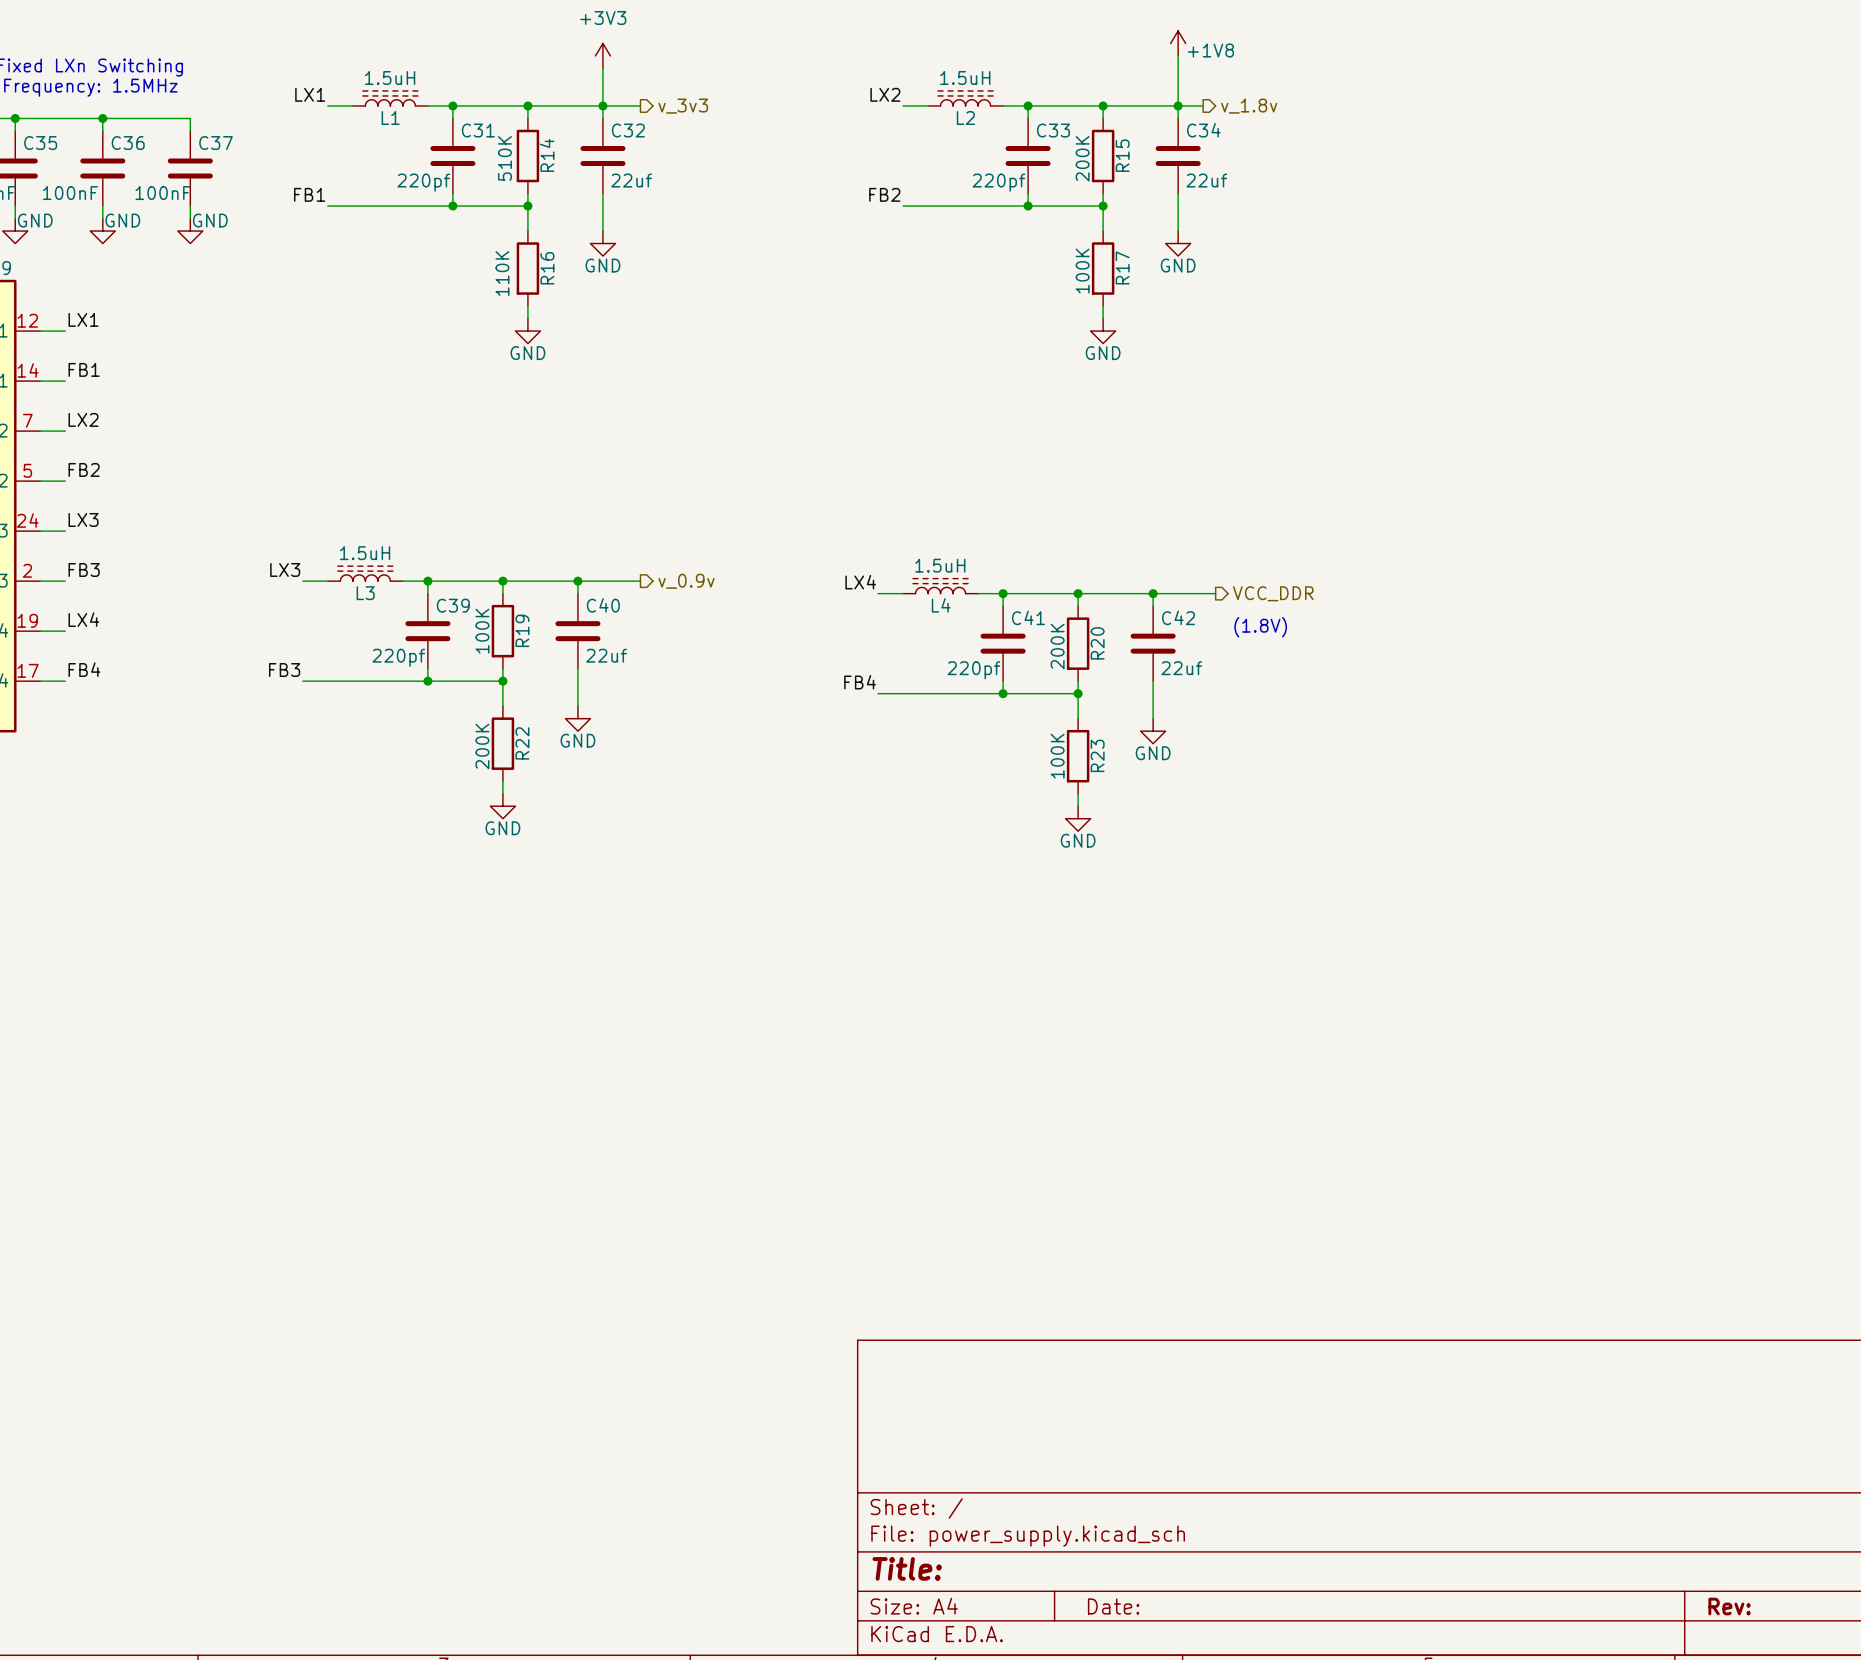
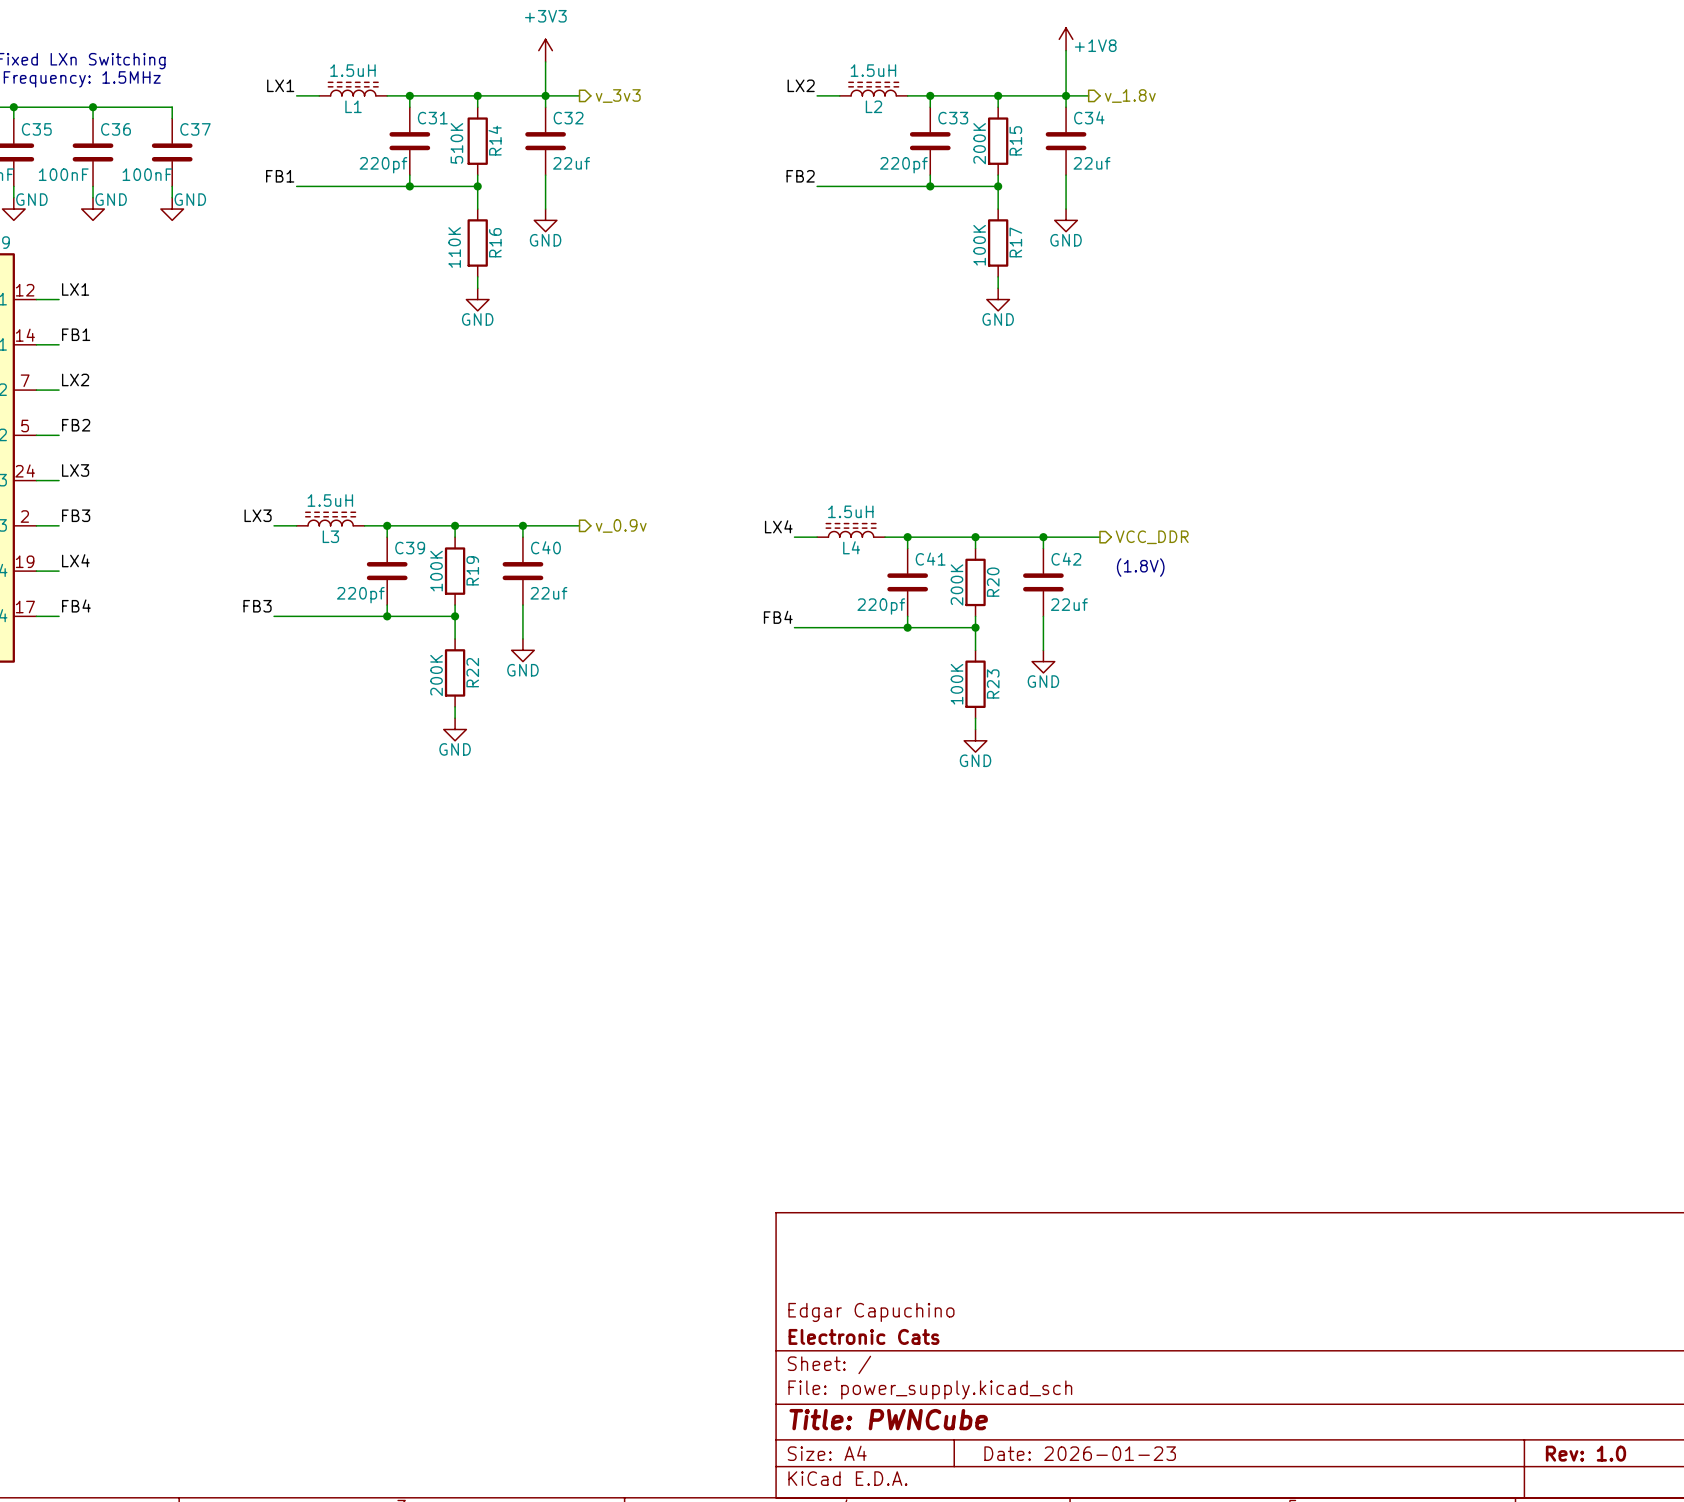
title block: none -> Edgar Capuchino (871, 1312)
title block: none -> Electronic Cats (864, 1336)
title block: Title: (907, 1568) -> Title: PWNCube (888, 1419)
title block: Date: (1113, 1606) -> Date: 2026-01-23 (1080, 1453)
title block: Rev: (1729, 1606) -> Rev: 1.0 (1585, 1453)

